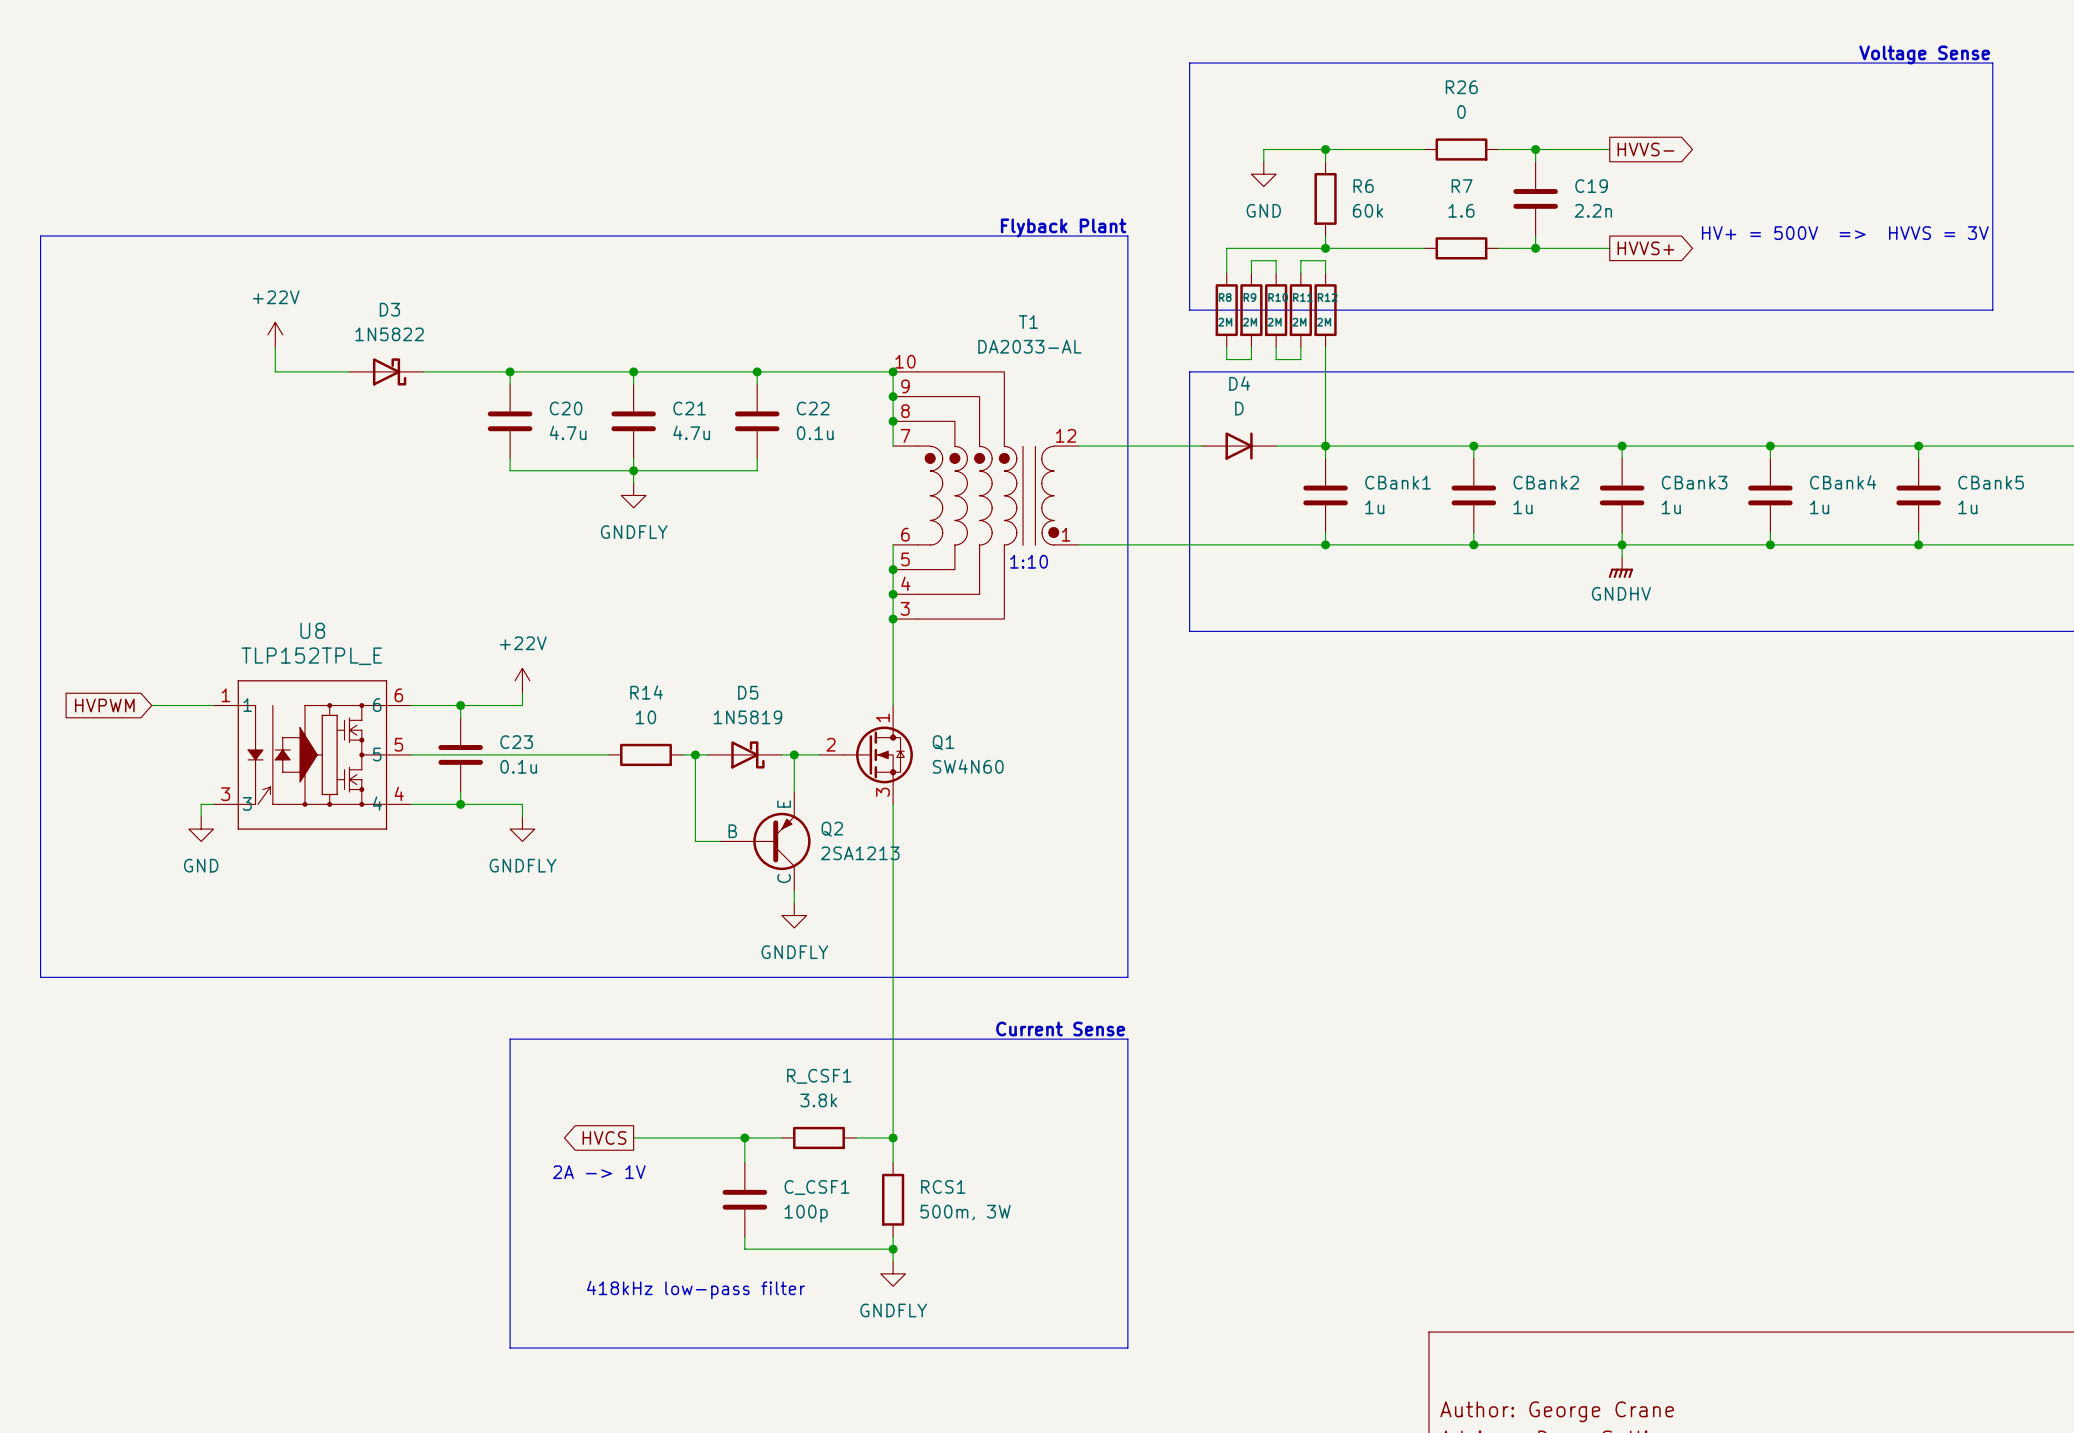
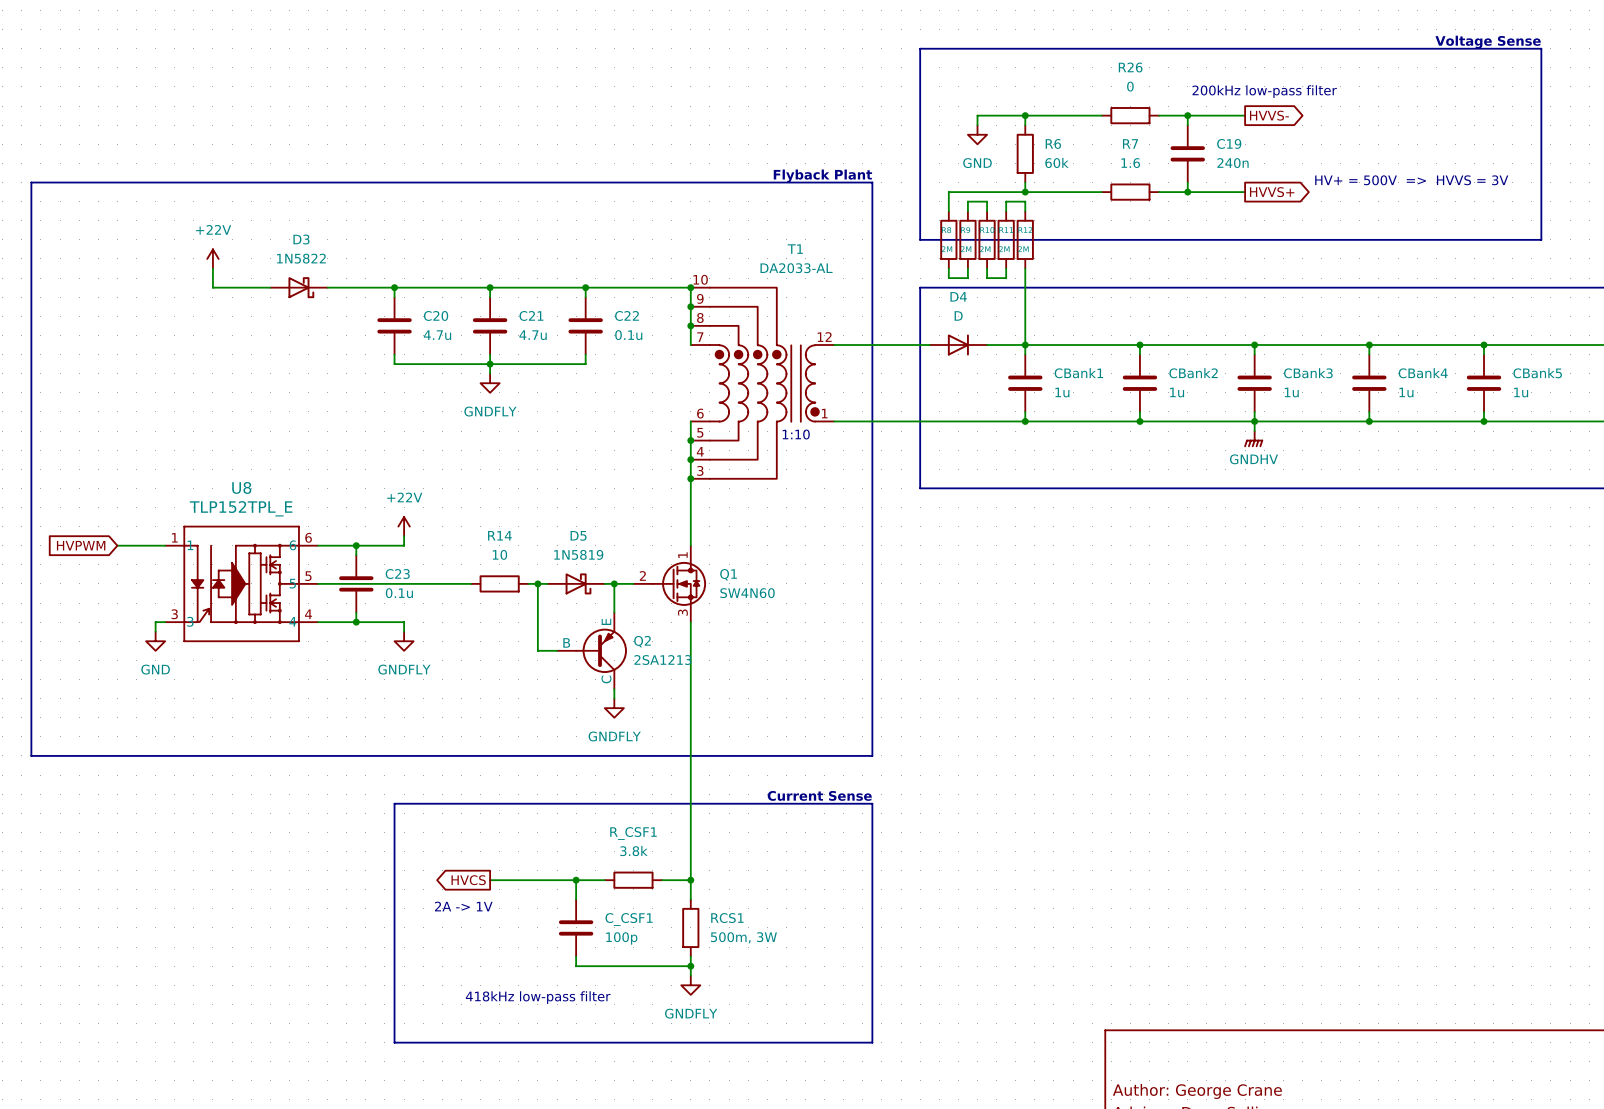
text: none -> 200kHz low-pass filter (1264, 91)
C19 value: 2.2n (1593, 210) -> 240n (1233, 163)

